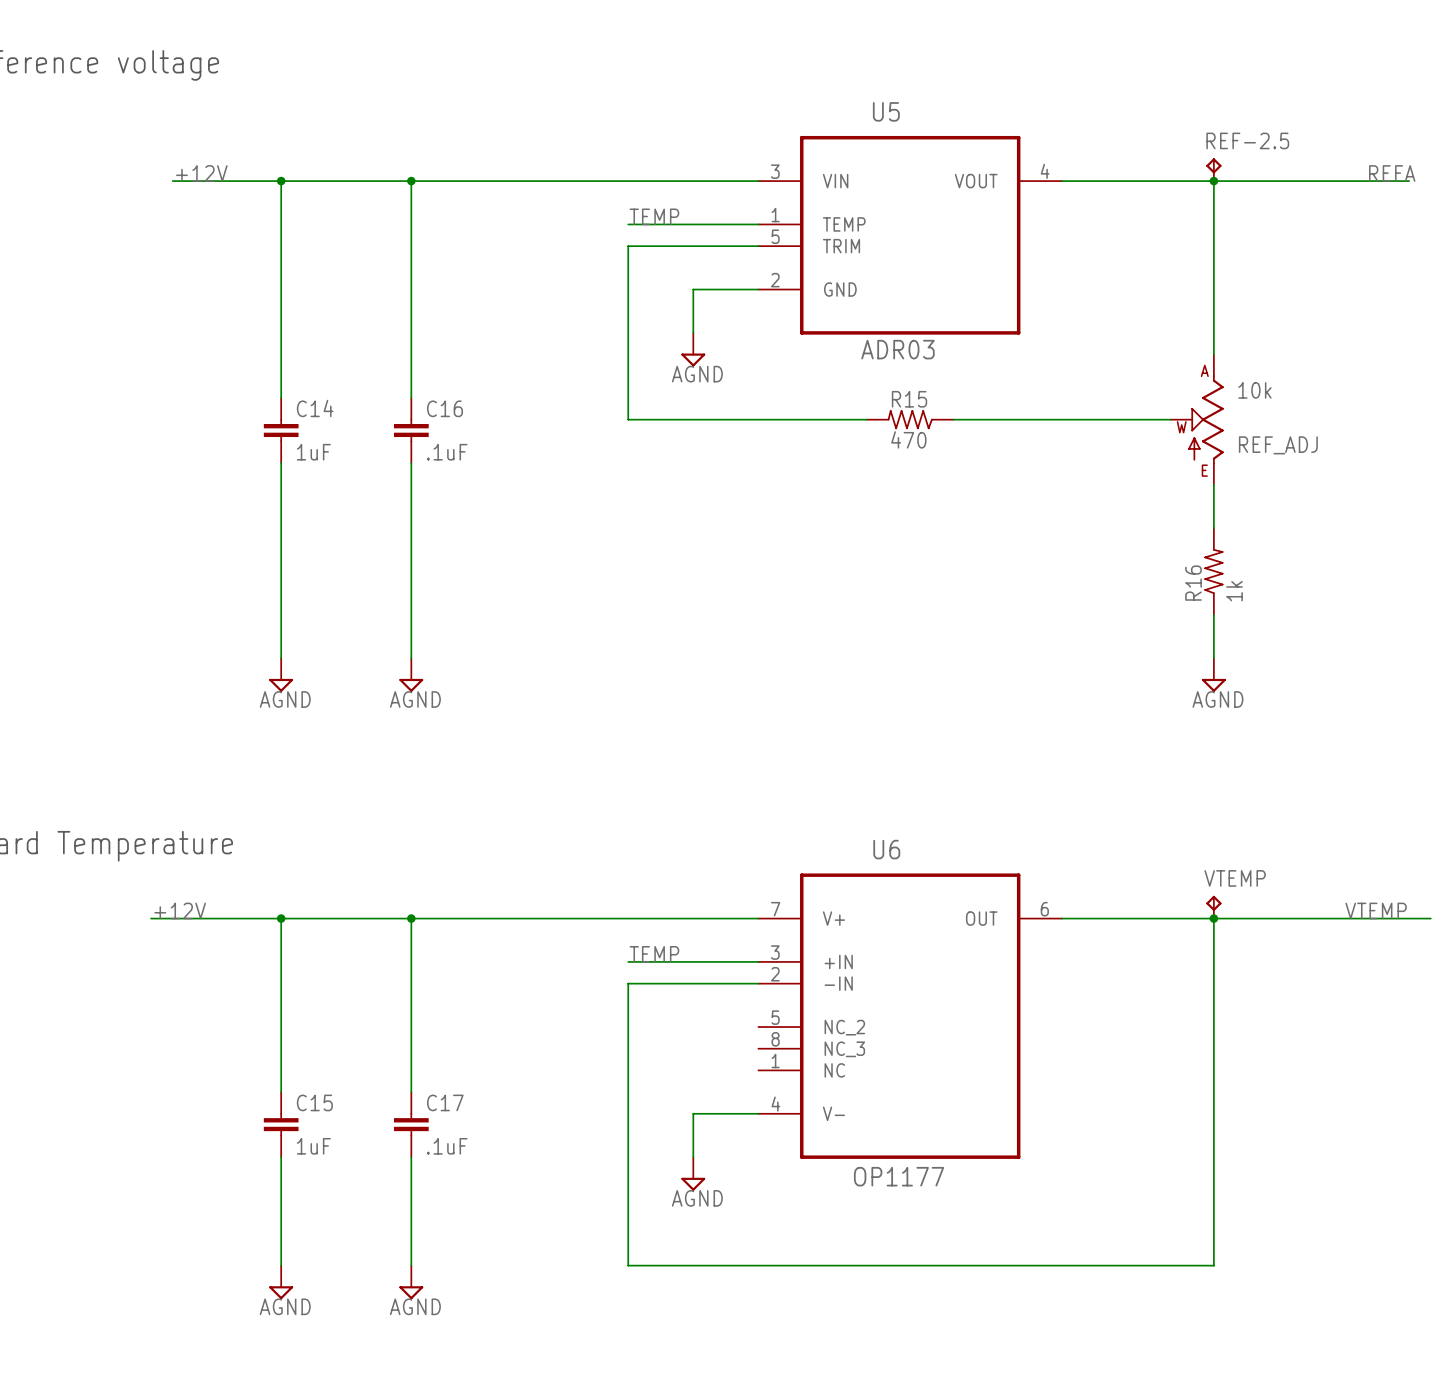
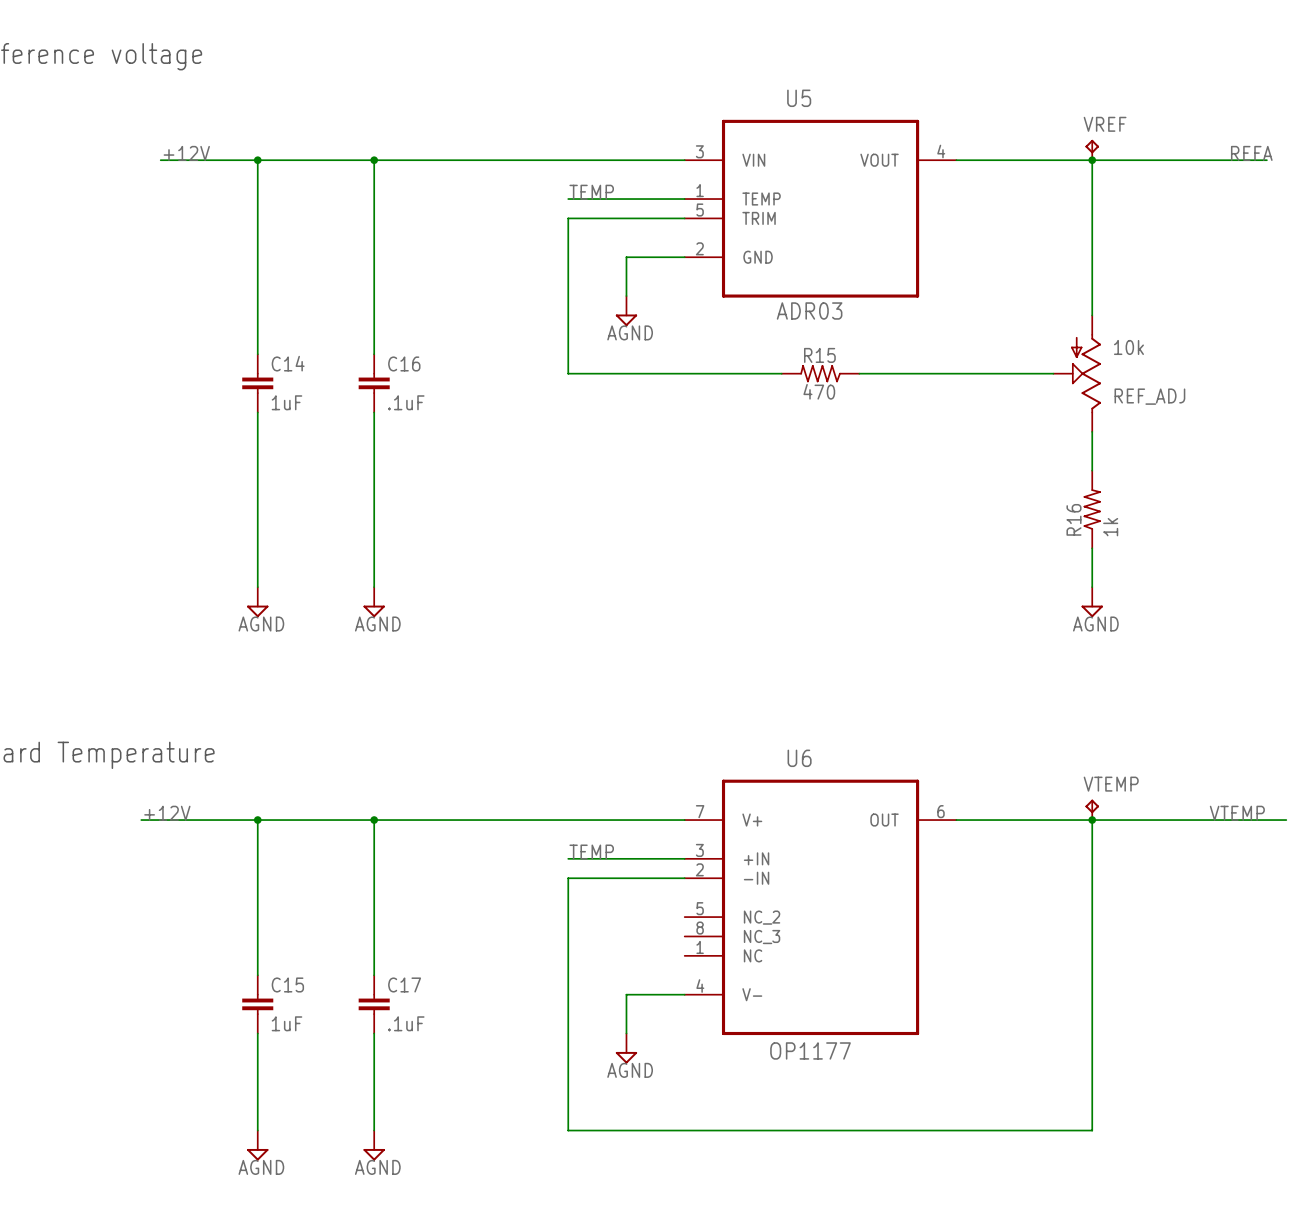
REF-2.5 name: REF-2.5 (1247, 140) -> VREF (1105, 124)
REF_ADJ symbol: [1170, 354, 1224, 485] -> [1053, 315, 1101, 432]

